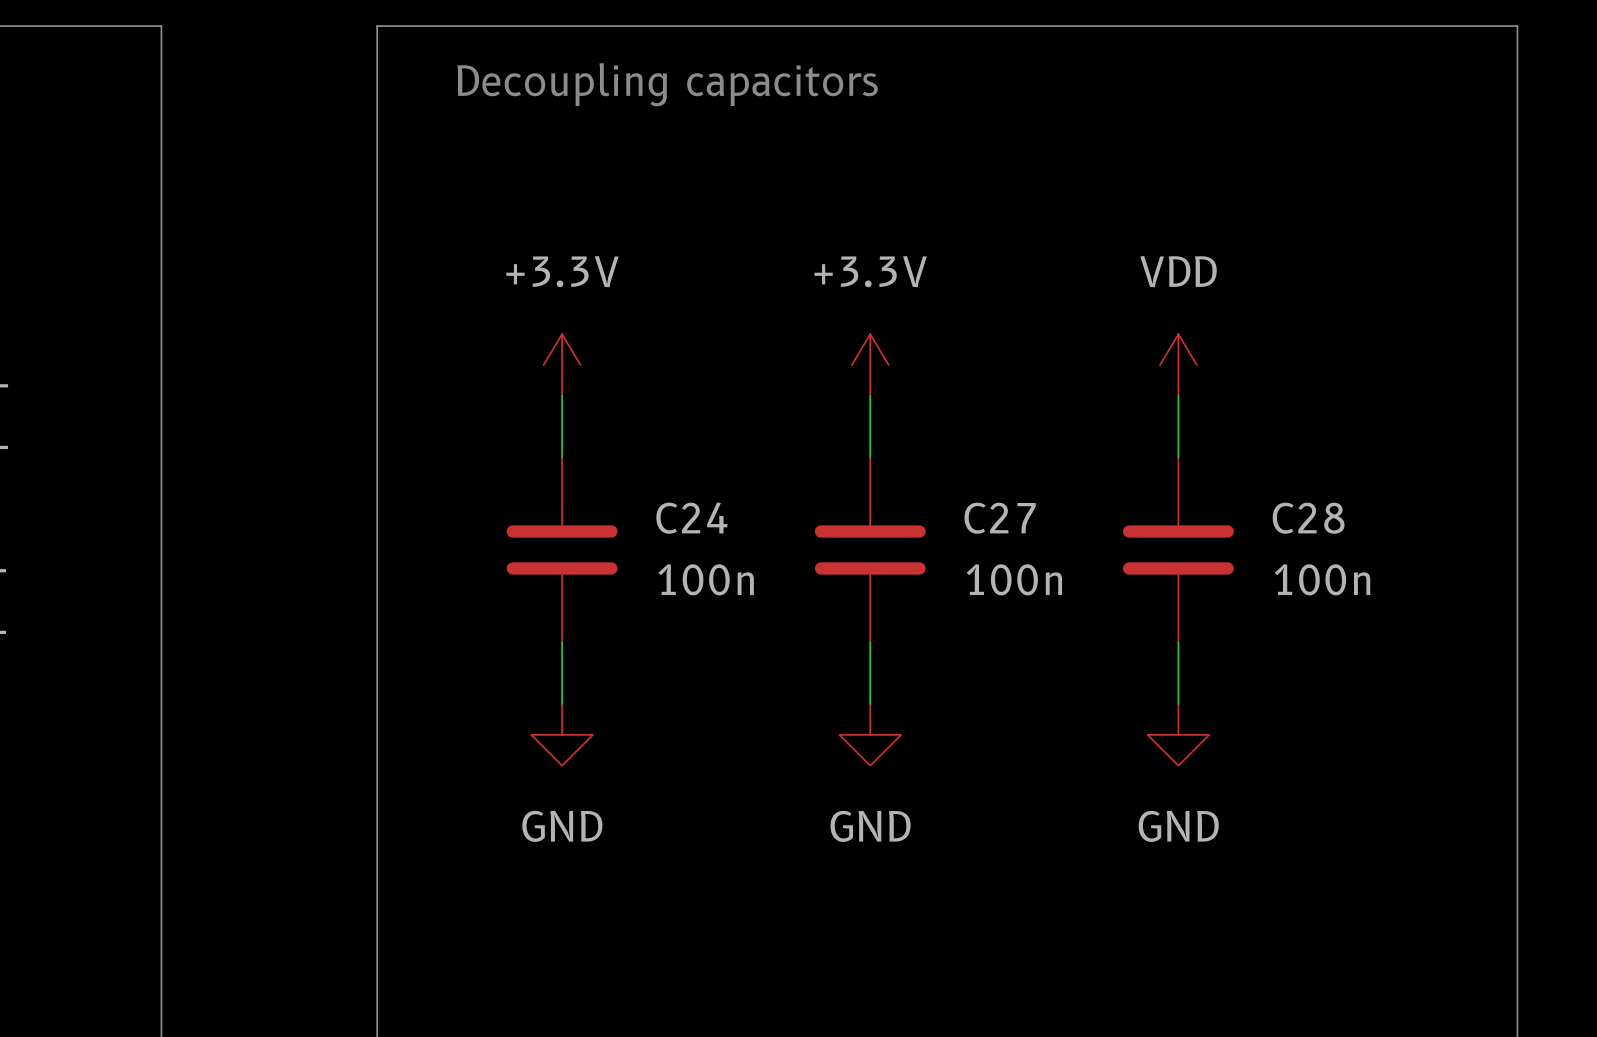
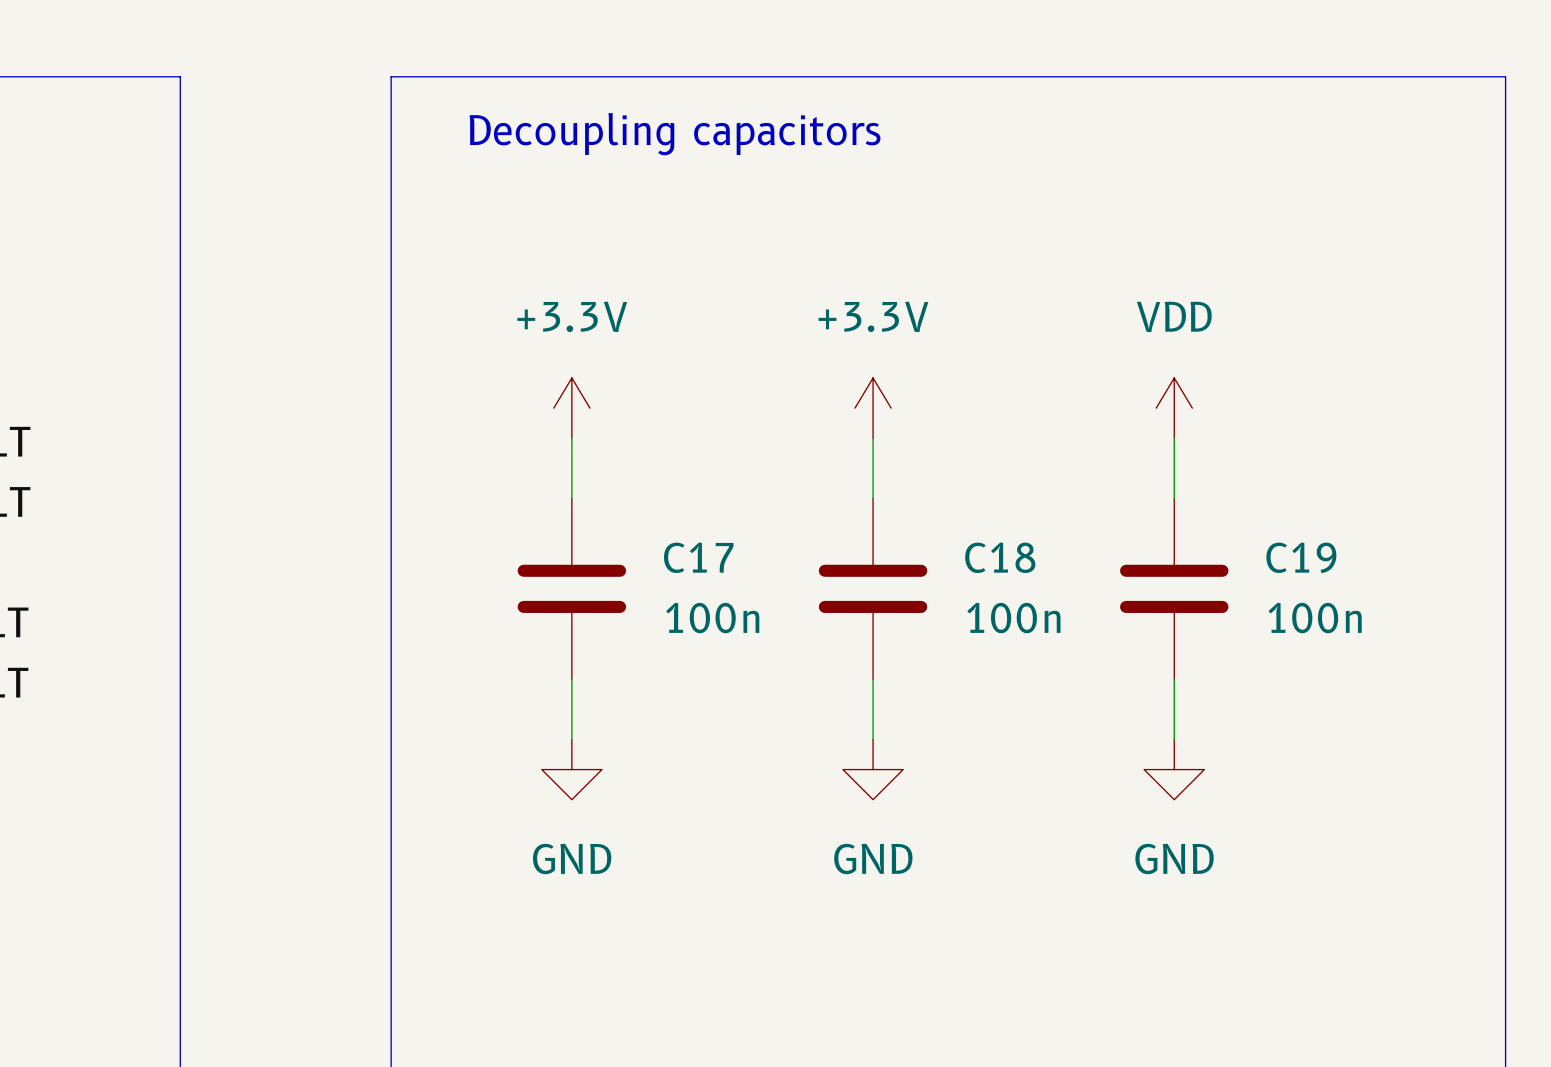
C24 name: C24 (691, 518) -> C17 (698, 557)
C27 name: C27 (1000, 518) -> C18 (1000, 557)
C28 name: C28 (1308, 518) -> C19 (1301, 557)

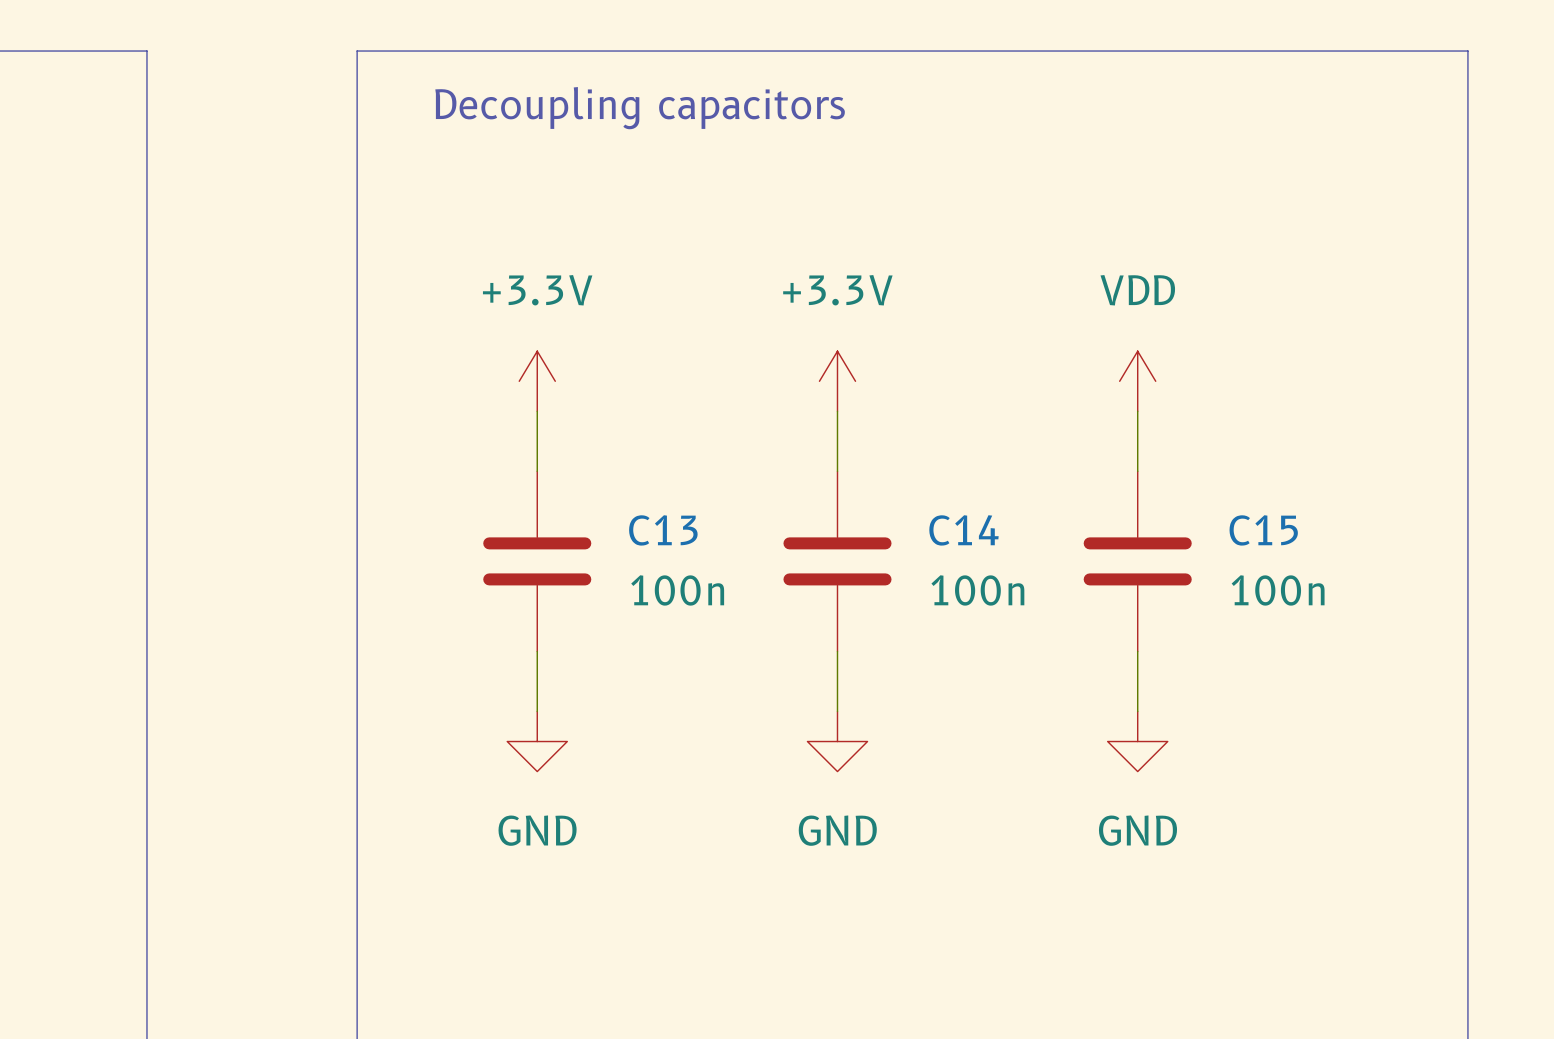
C17 name: C17 (698, 557) -> C13 (663, 530)
C18 name: C18 (1000, 557) -> C14 (963, 530)
C19 name: C19 (1301, 557) -> C15 (1263, 530)

